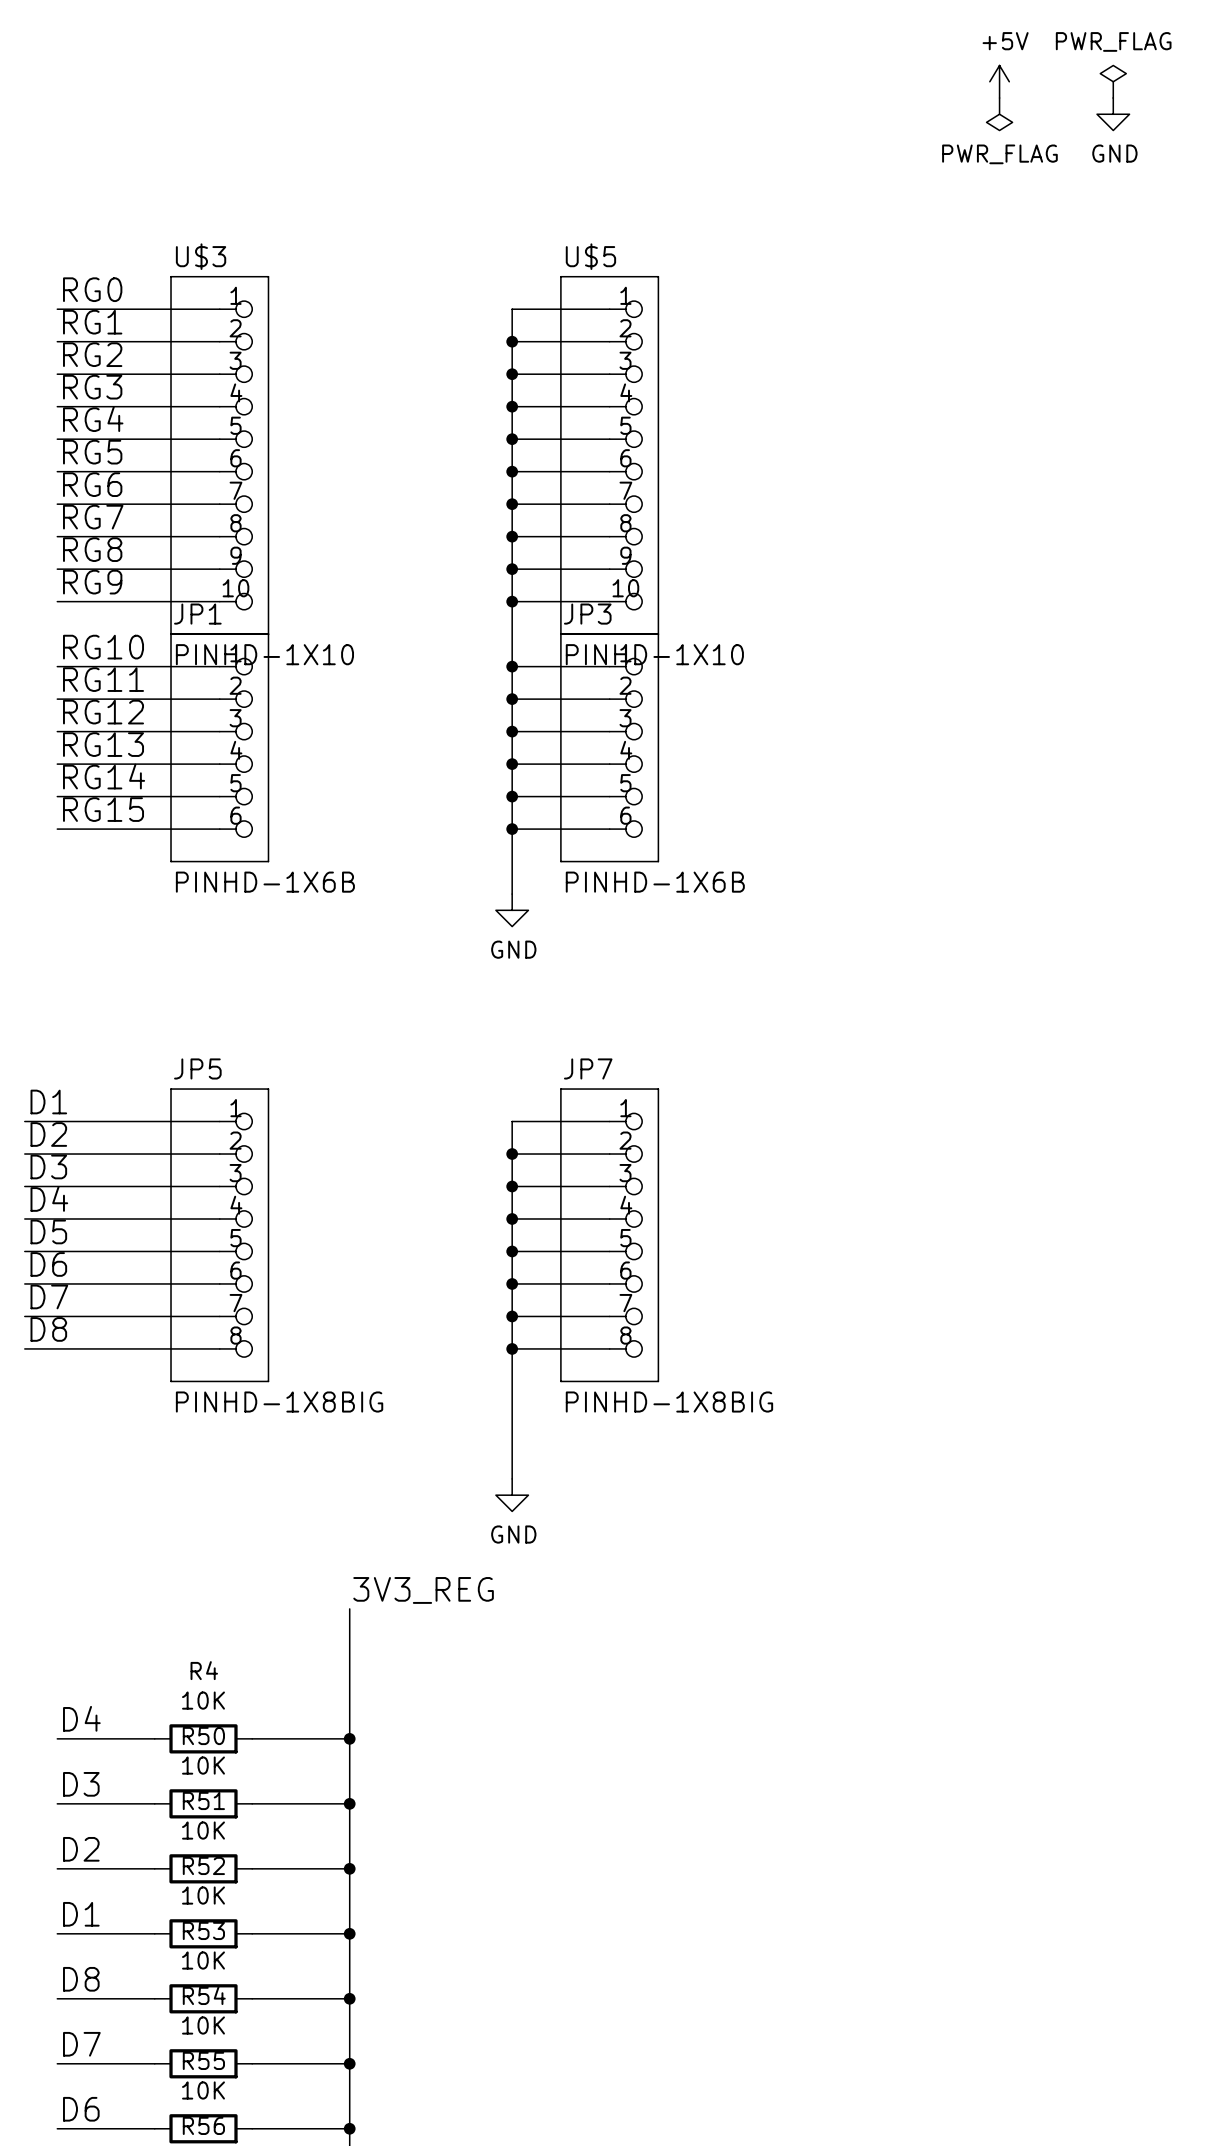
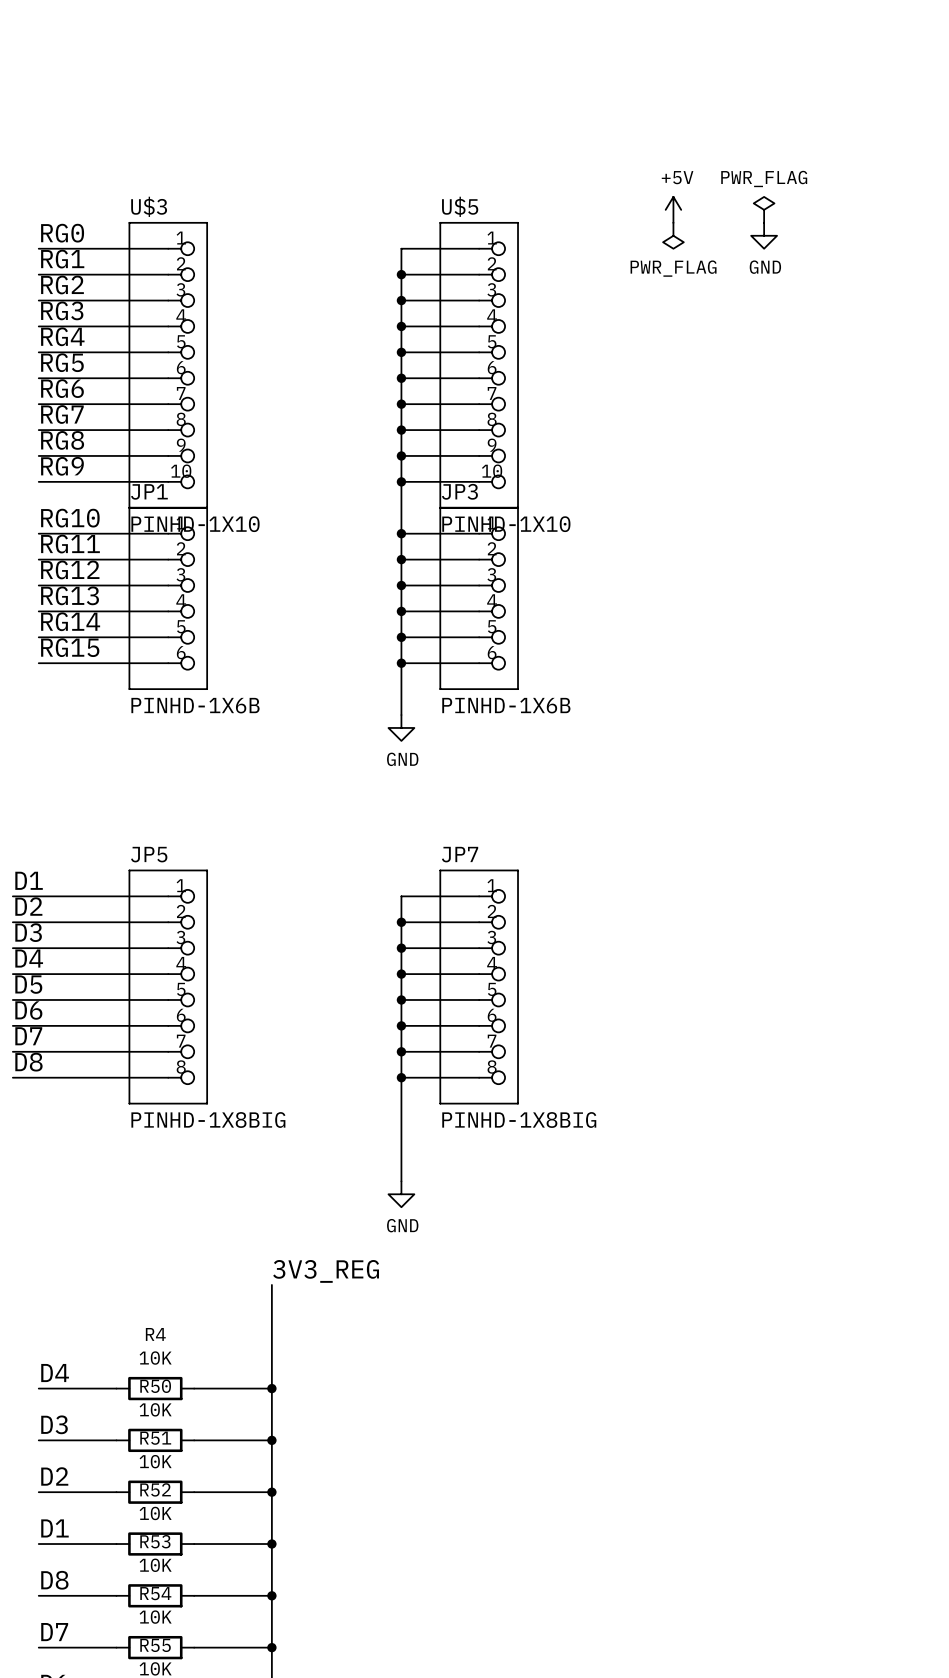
power symbol position: +5V (999, 81) -> +5V (673, 209)
power symbol: PWR_FLAG (1113, 81) -> none
power symbol: PWR_FLAG (999, 114) -> none
power symbol position: GND (1113, 114) -> GND (764, 235)
power symbol: none -> PWR_FLAG (764, 209)
power symbol: none -> PWR_FLAG (673, 235)

